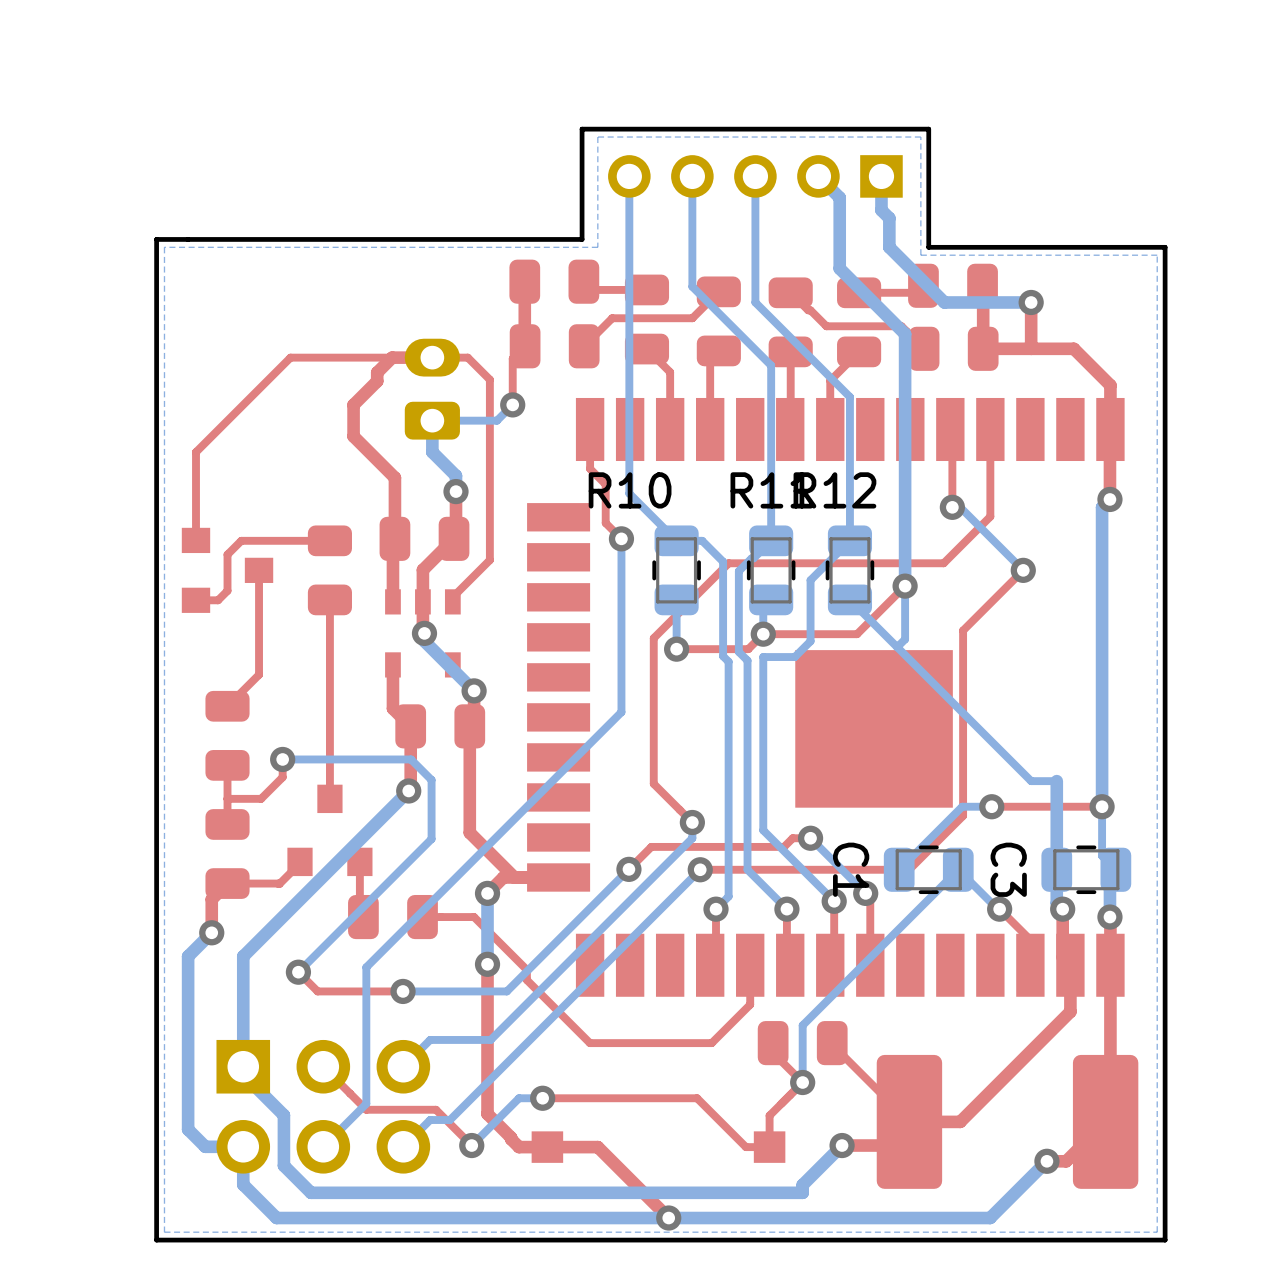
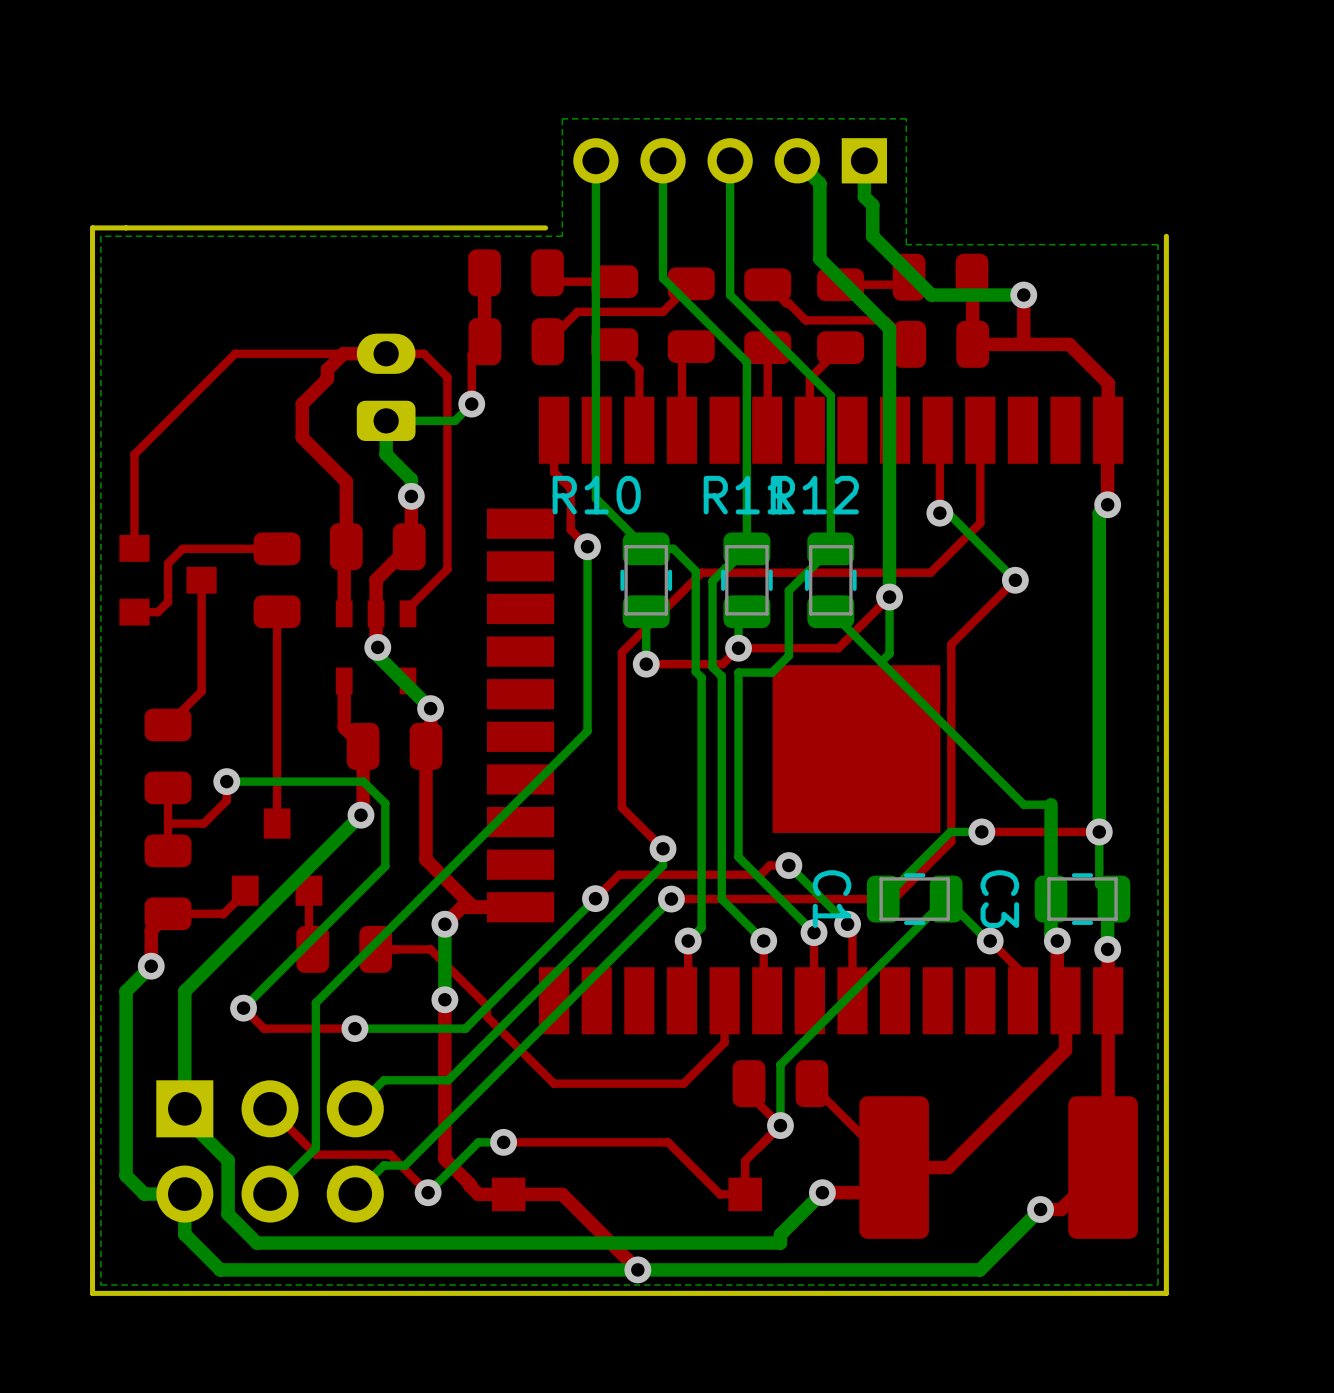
board edge: (582, 239) (582, 129) (928, 129) (928, 247) (1165, 247) -> none

